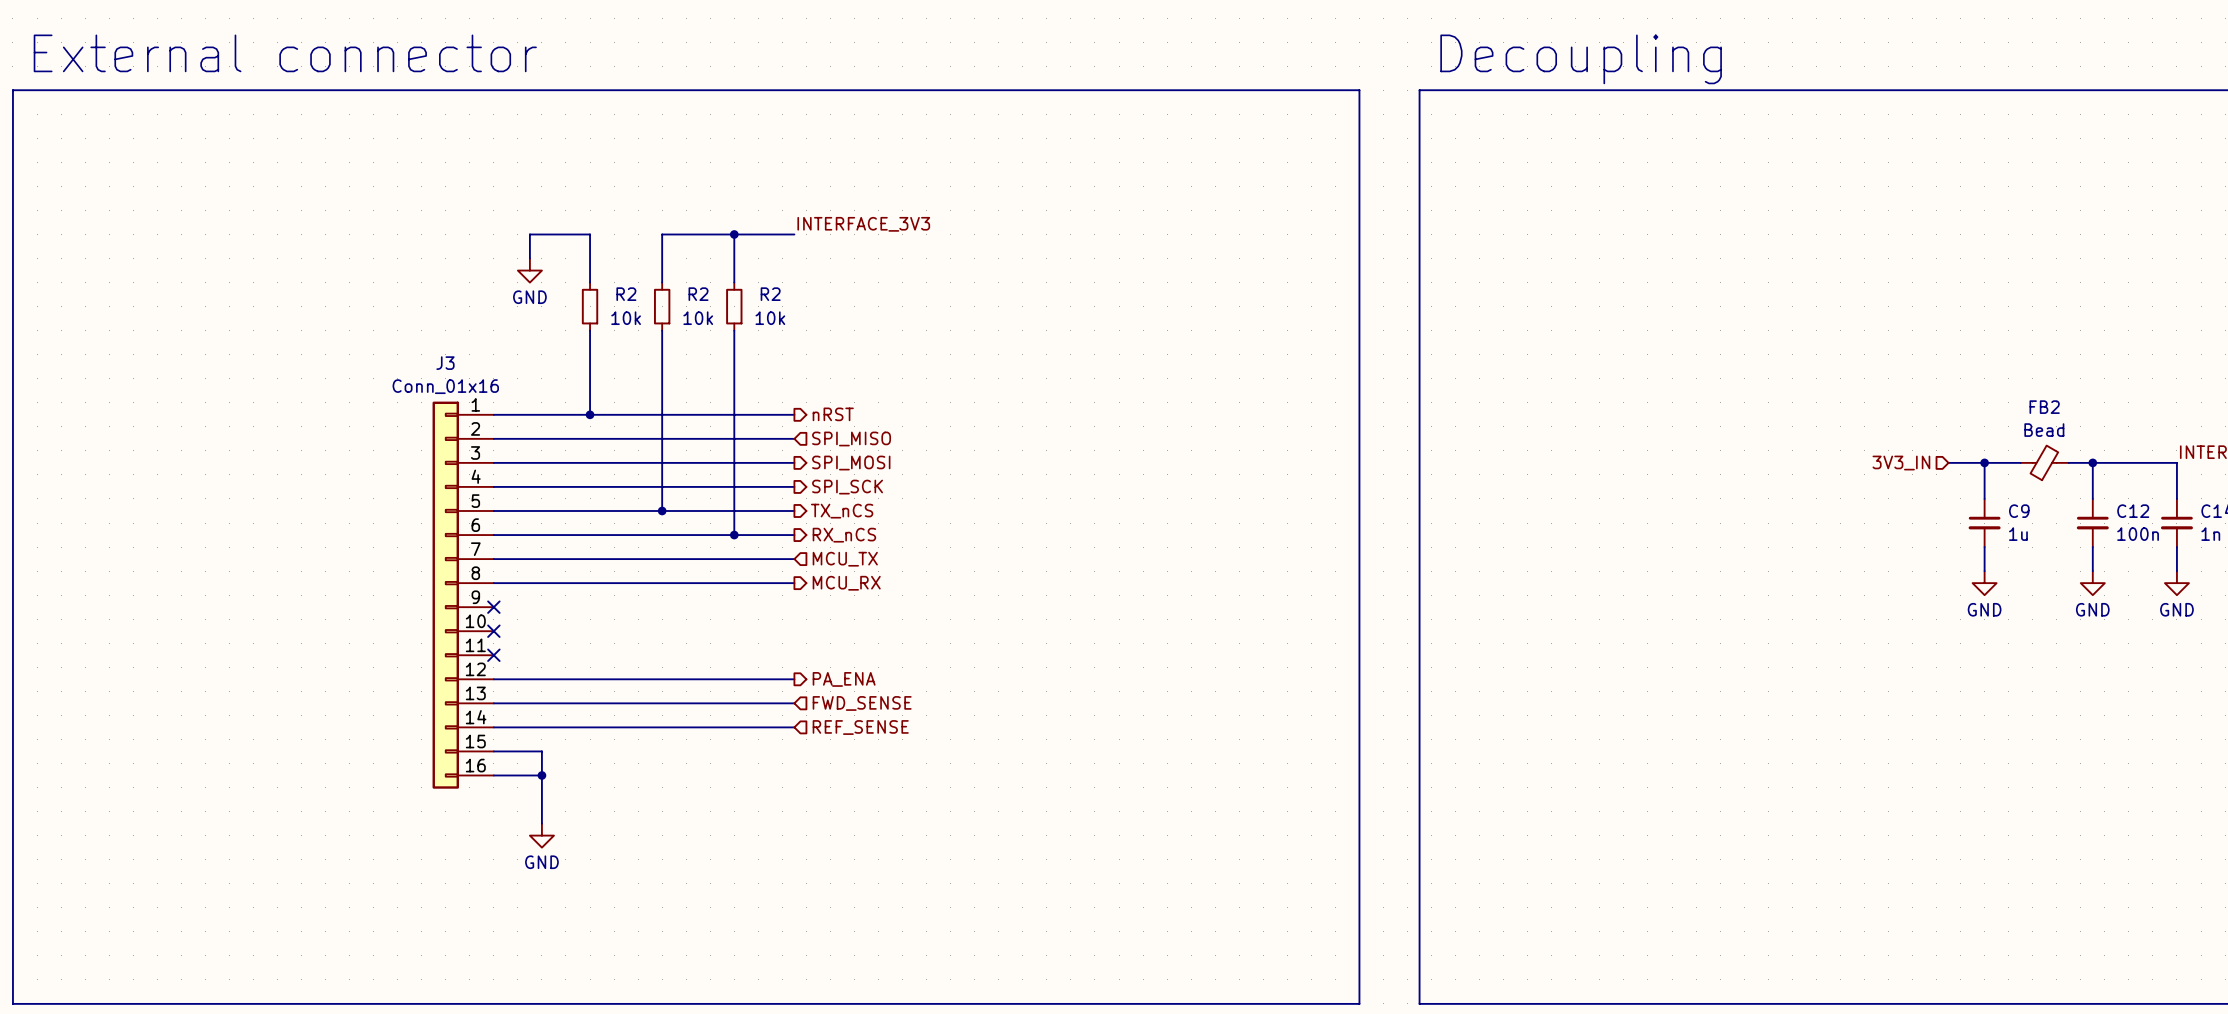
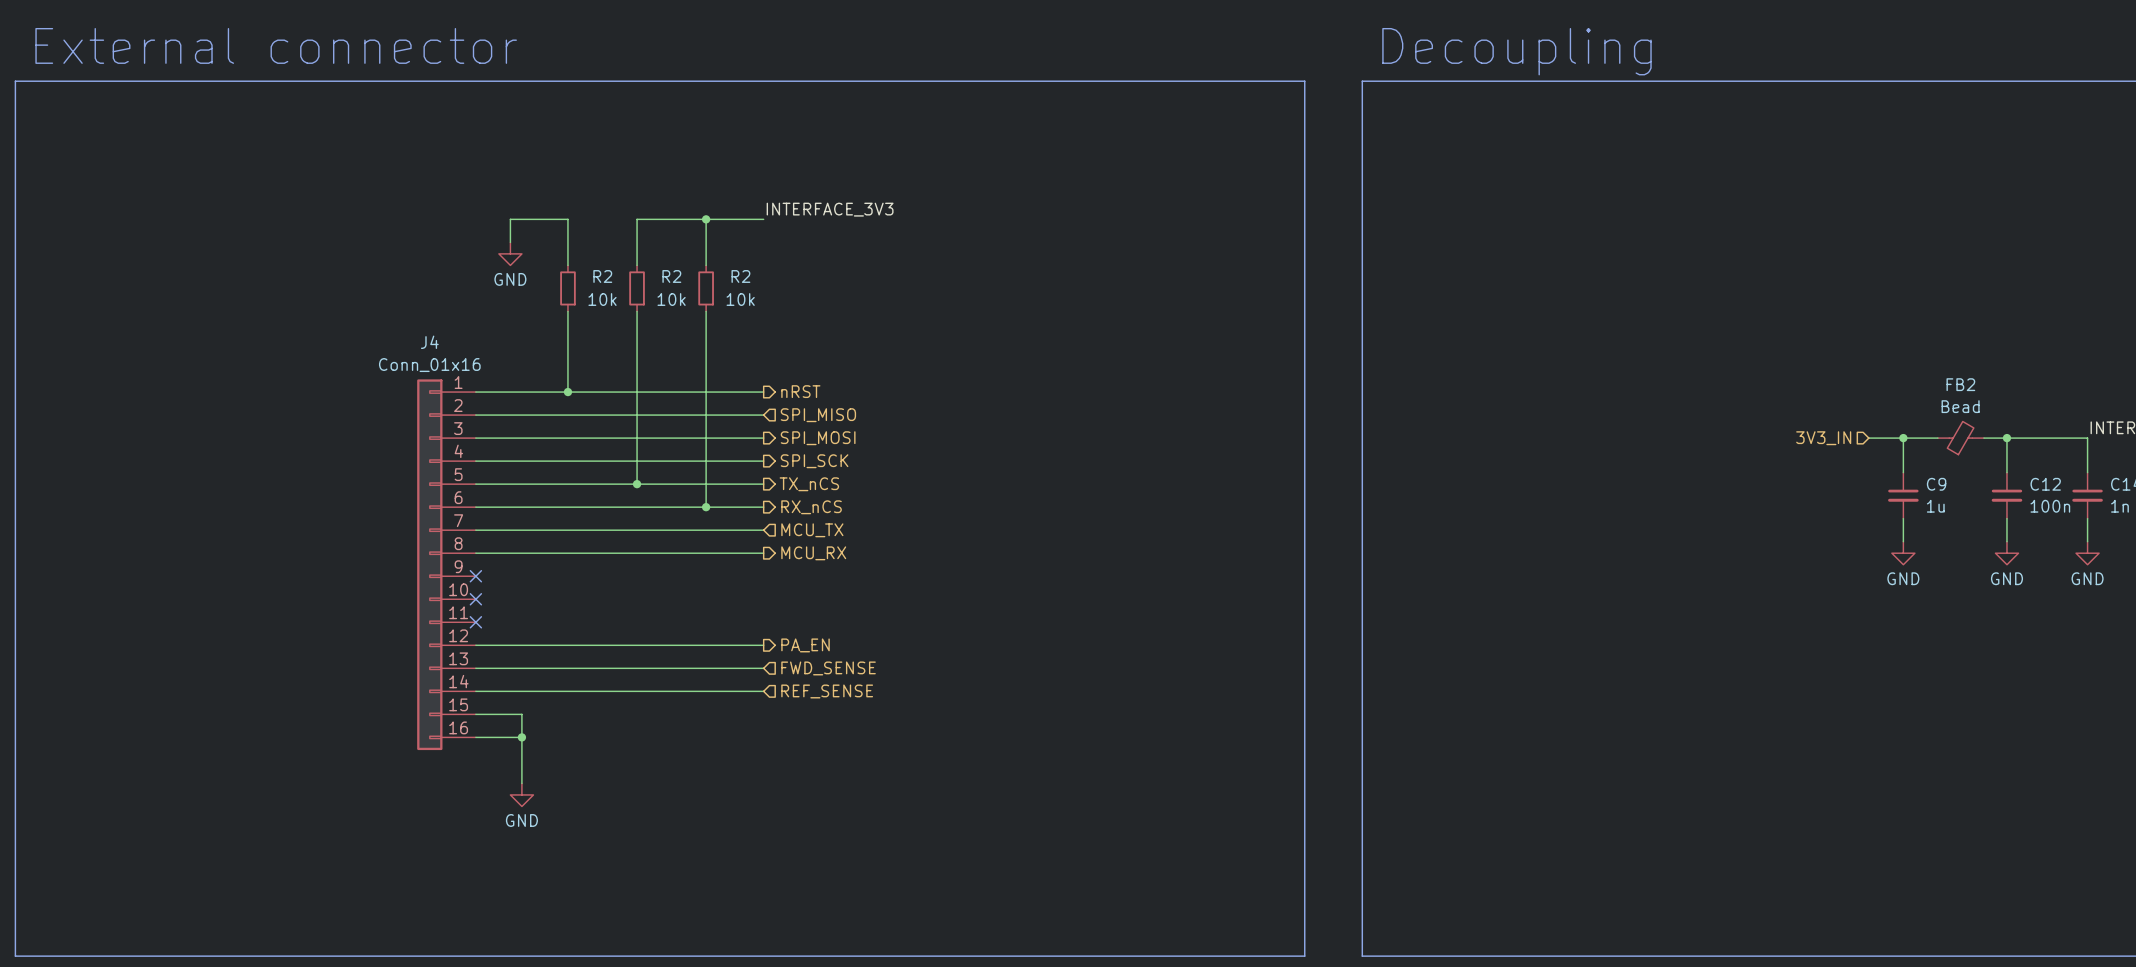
J3 name: J3 (445, 363) -> J4 (429, 342)
hierarchical label: PA_ENA (844, 679) -> PA_EN (805, 645)

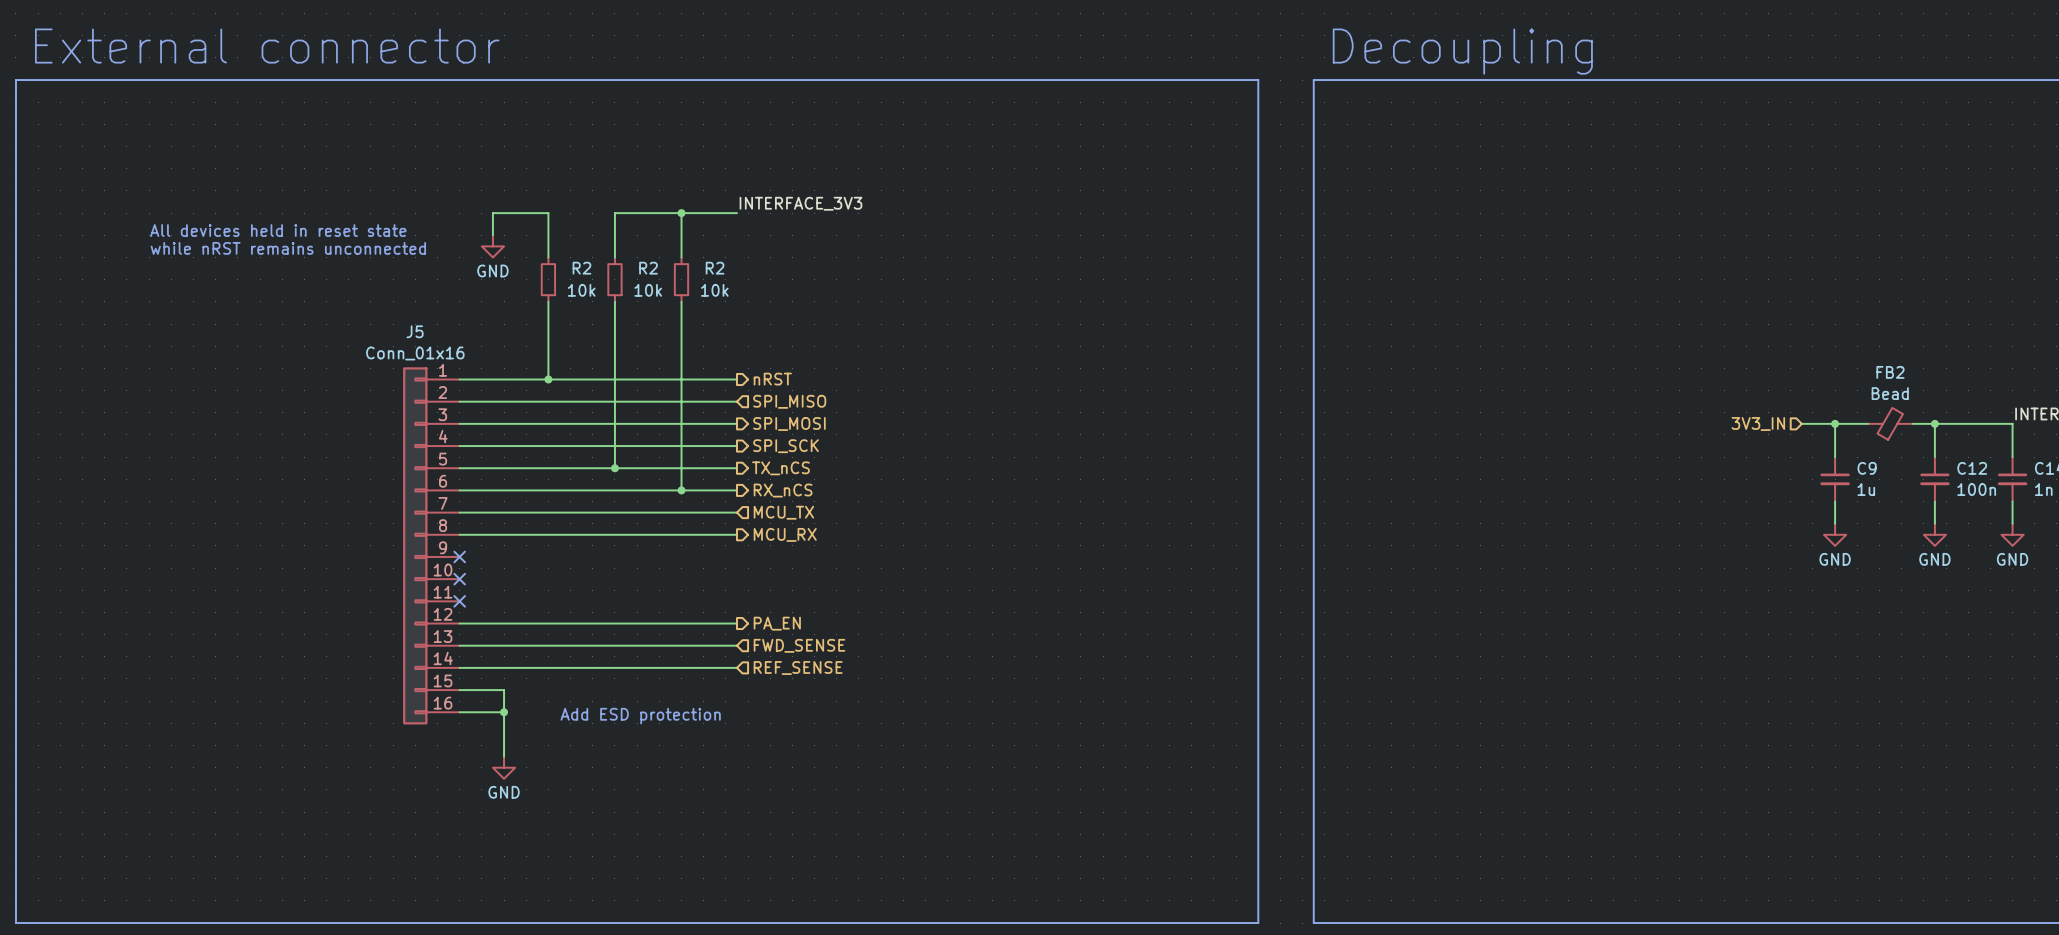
text: none -> All devices held in reset state (278, 230)
text: none -> while nRST remains unconnected (288, 248)
J4 name: J4 (429, 342) -> J5 (415, 331)
text: none -> Add ESD protection (640, 716)

